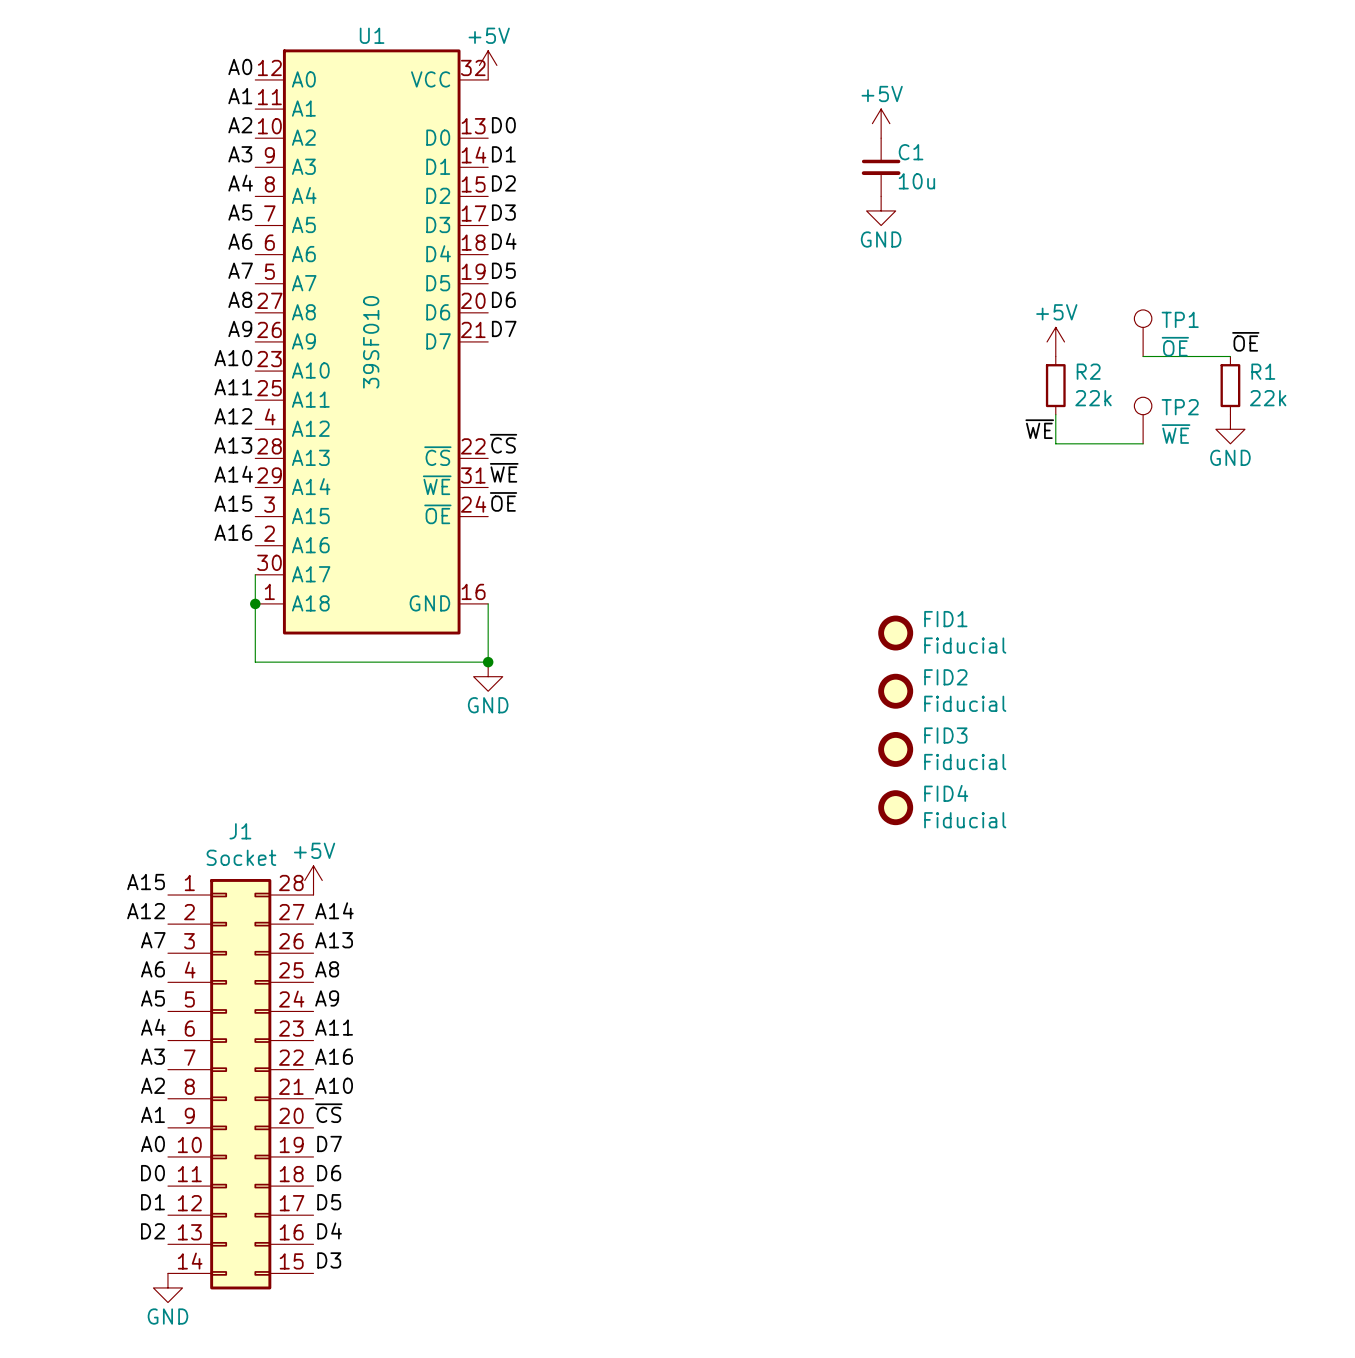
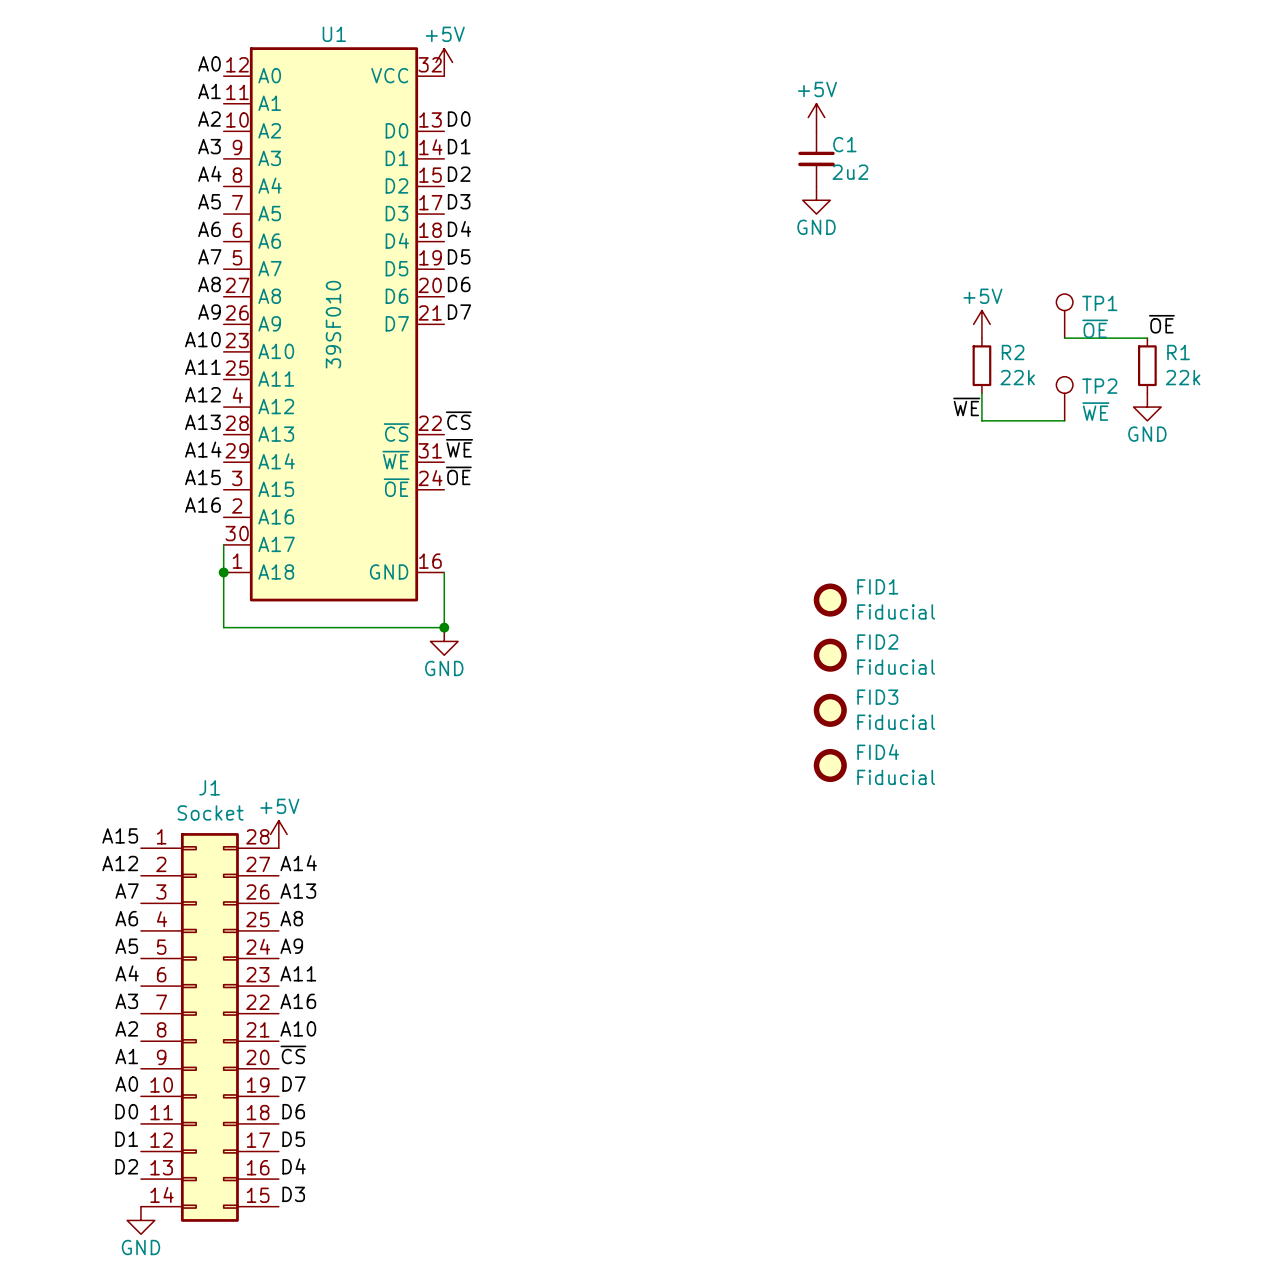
C1 value: 10u (916, 181) -> 2u2 (850, 172)

